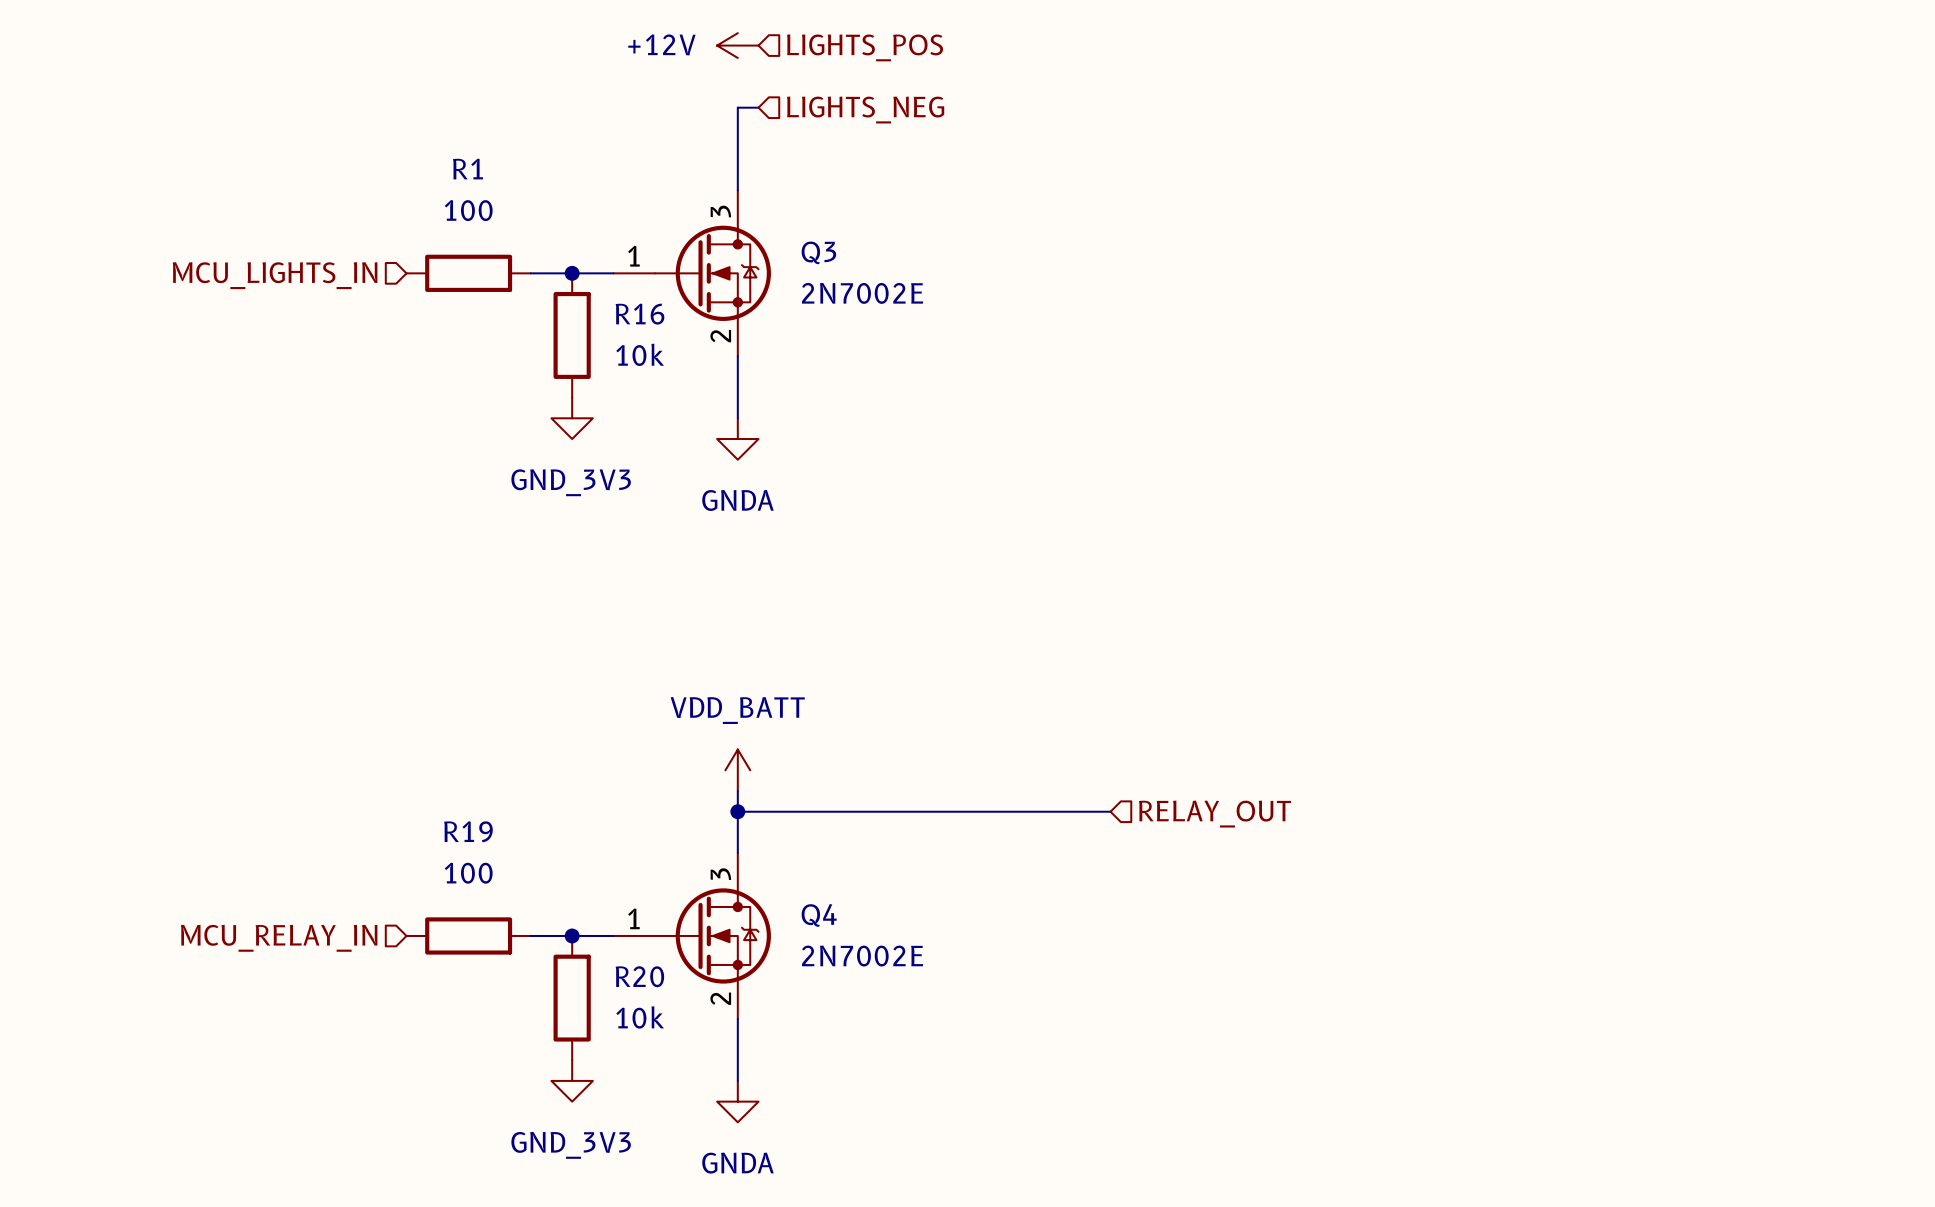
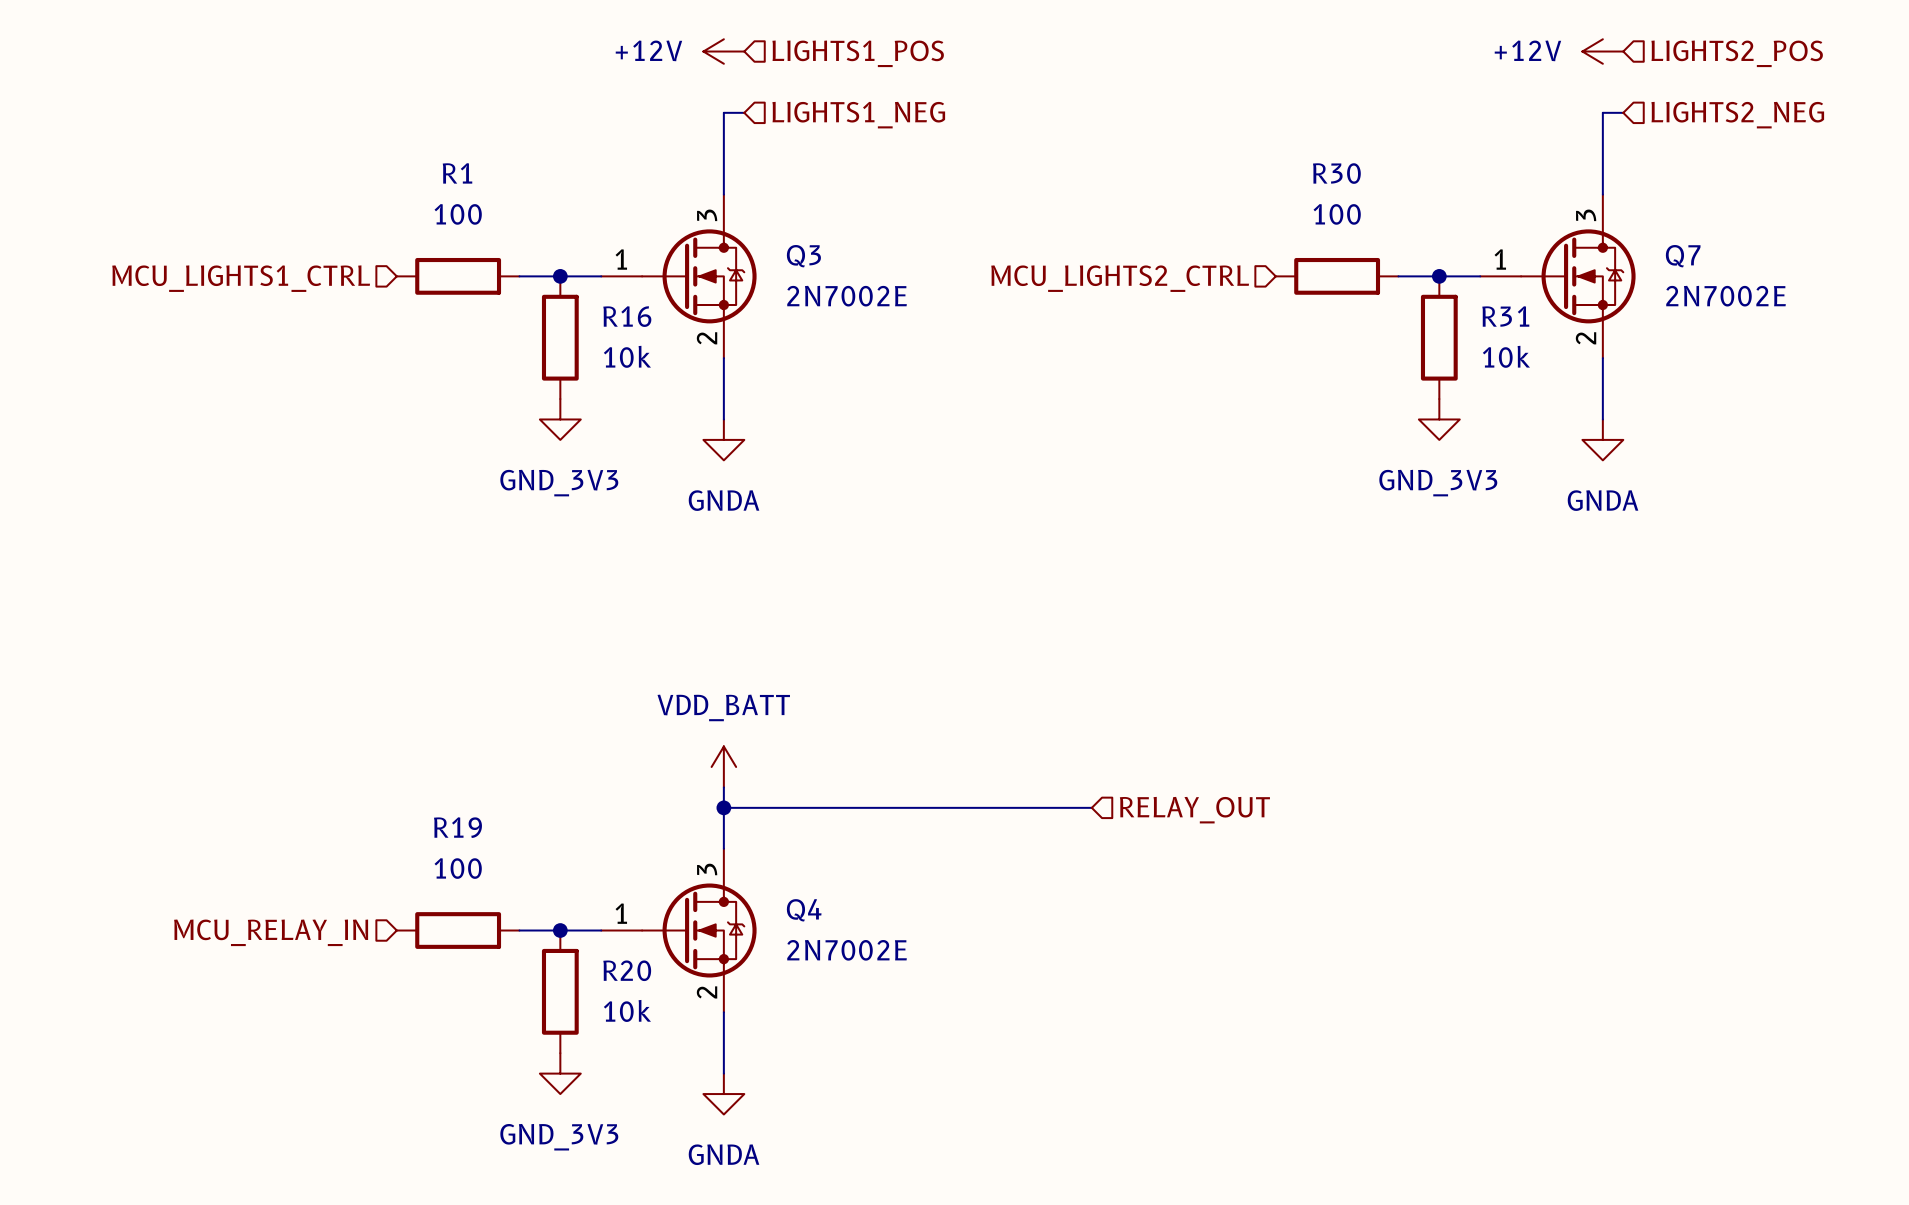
power symbol: none -> +12V (1602, 51)
hierarchical label: LIGHTS_POS (864, 47) -> LIGHTS1_POS (858, 53)
hierarchical label: none -> LIGHTS2_POS (1737, 53)
wire: none -> (1623, 112) (1602, 112) (1602, 194)
hierarchical label: LIGHTS_NEG (865, 110) -> LIGHTS1_NEG (858, 115)
hierarchical label: none -> LIGHTS2_NEG (1737, 115)
R30: none -> 100 (1337, 276)
wire: none -> (1398, 276) (1480, 276)
junction: none -> (1439, 276)
Q7: none -> 2N7002E (1557, 276)
hierarchical label: MCU_LIGHTS_IN (275, 275) -> MCU_LIGHTS1_CTRL (241, 278)
hierarchical label: none -> MCU_LIGHTS2_CTRL (1120, 278)
R31: none -> 10k (1439, 337)
wire: none -> (1602, 358) (1602, 419)
power symbol: none -> GND_3V3 (1439, 419)
power symbol: none -> GNDA (1602, 439)

